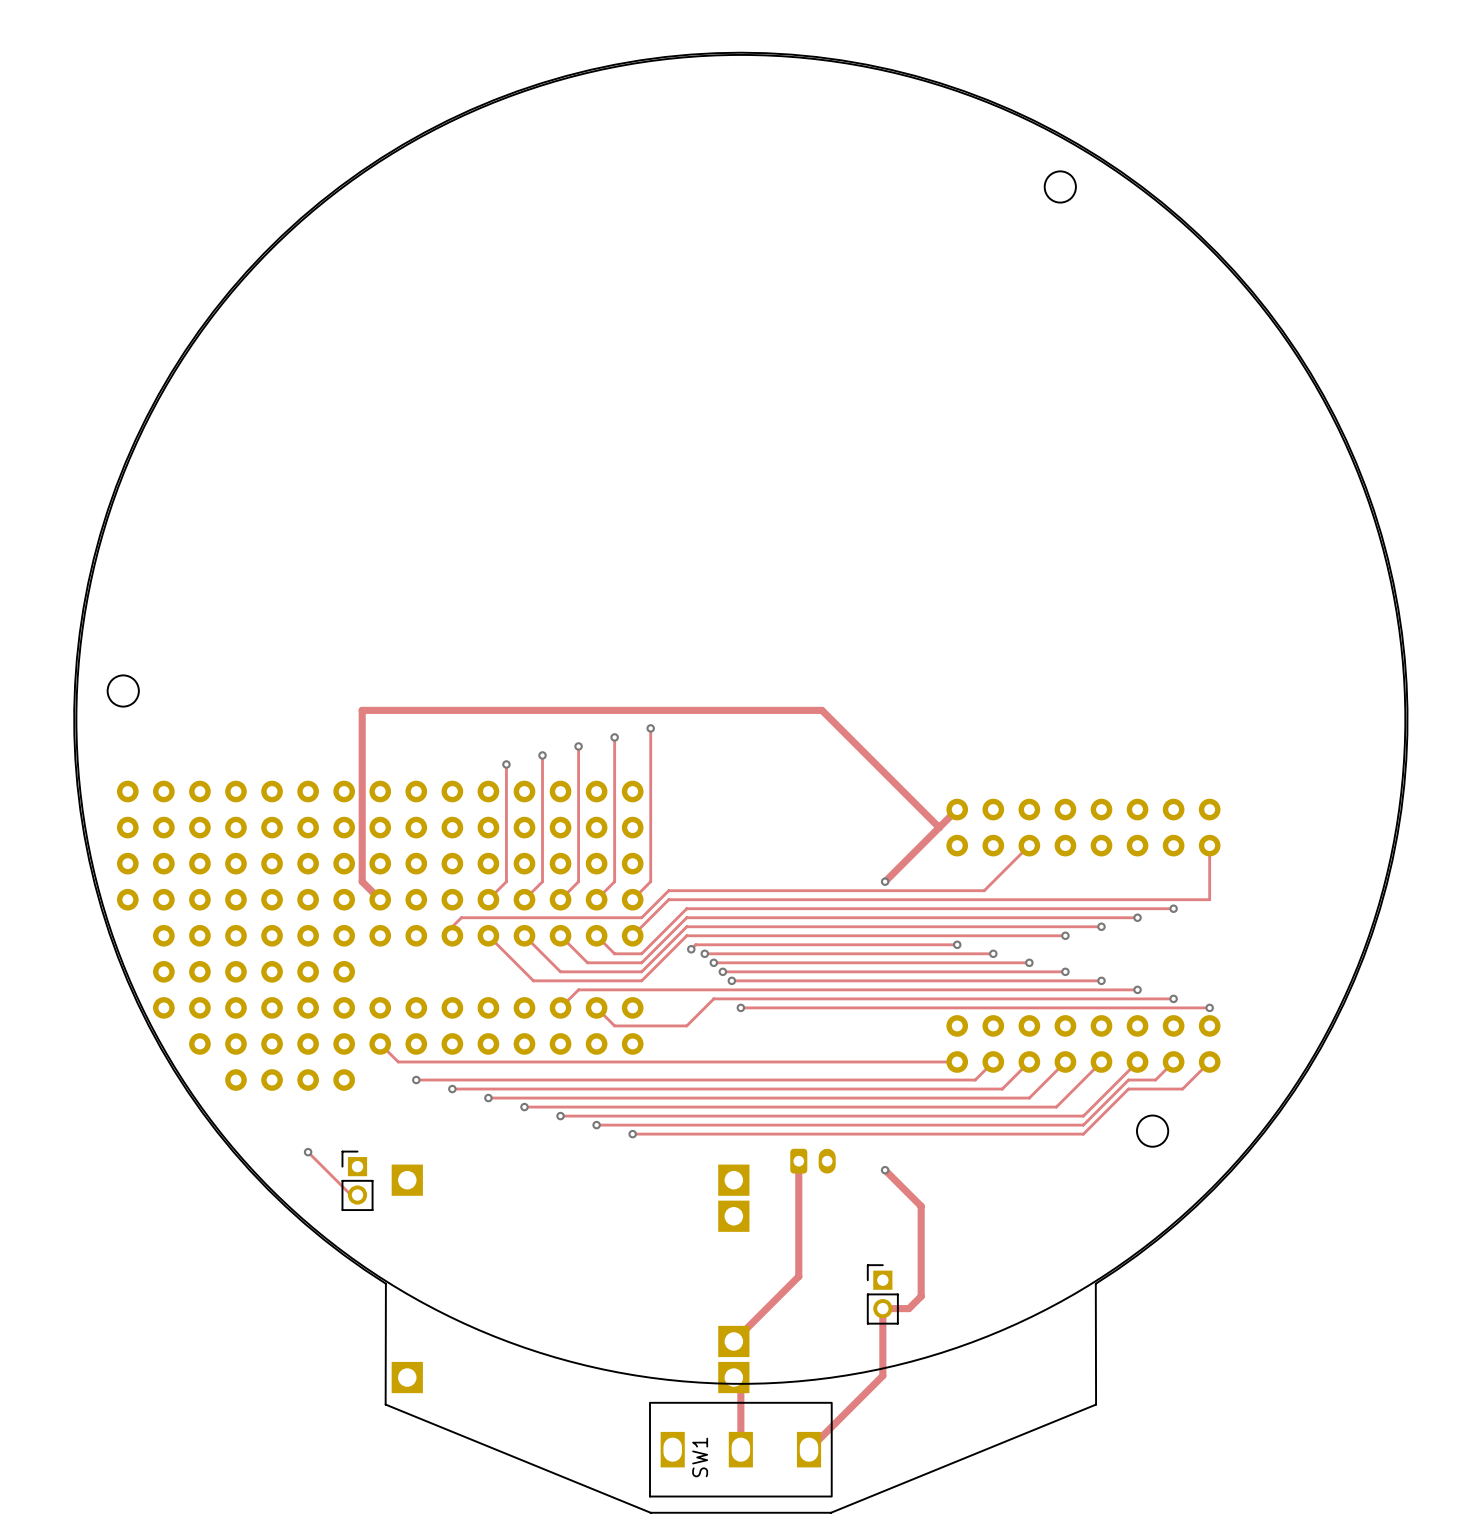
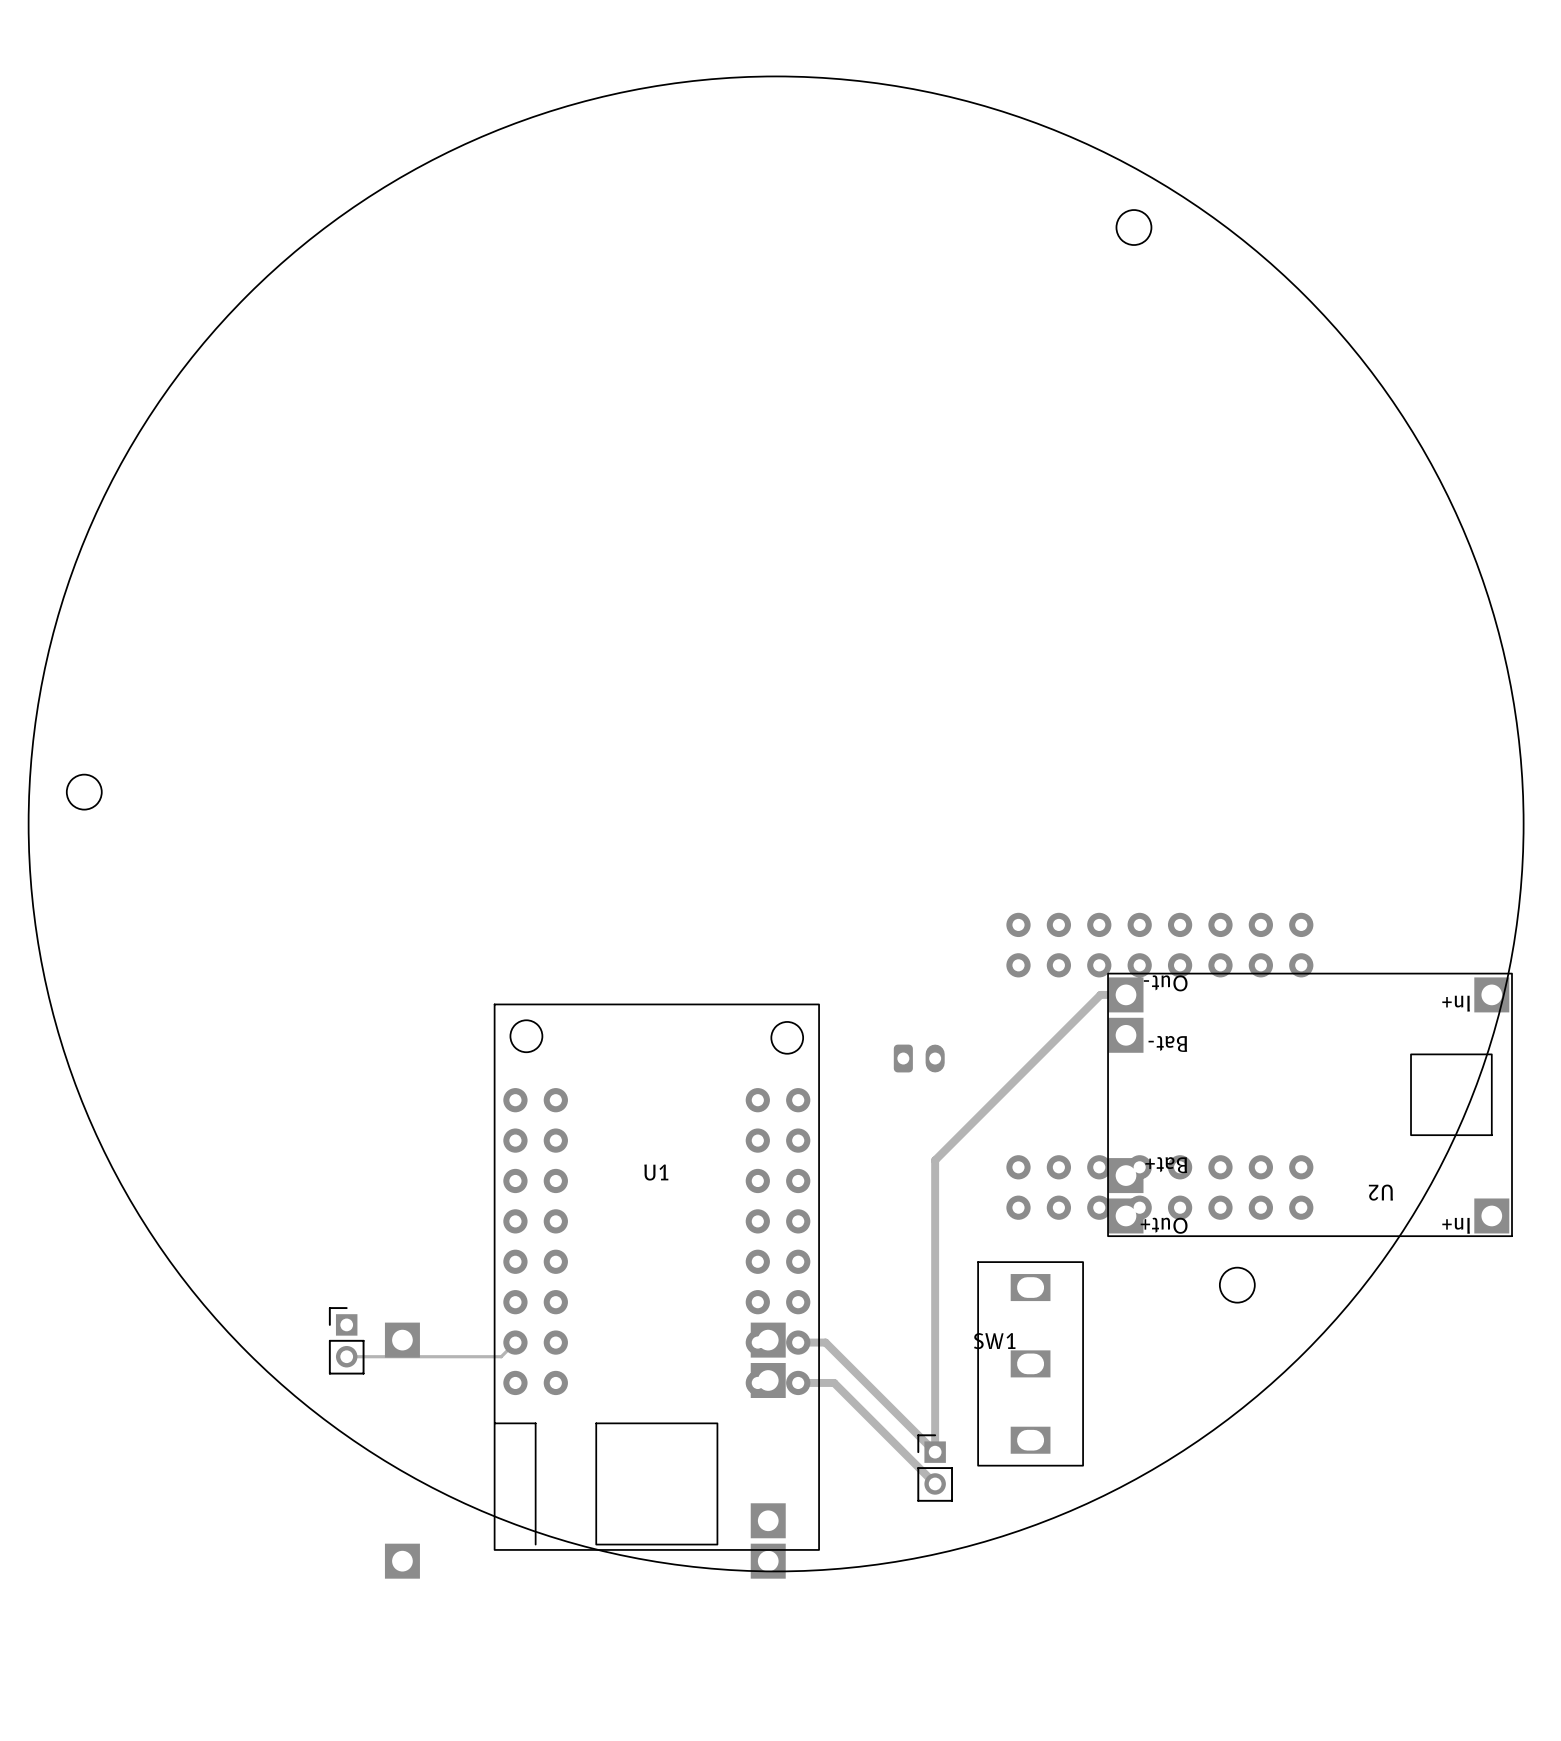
round board edge: none -> [28, 76, 1525, 1572]
drawing: [75, 54, 1407, 1385] -> none
track: (650, 728) (650, 881) (632, 899) -> none
via: (650, 728) -> none
track: (614, 737) (614, 881) (596, 899) -> none
via: (614, 737) -> none
track: (578, 746) (578, 881) (560, 899) -> none
via: (578, 746) -> none
track: (542, 755) (542, 881) (524, 899) -> none
via: (542, 755) -> none
track: (506, 764) (506, 881) (488, 899) -> none
via: (506, 764) -> none
part: (127, 791) -> none
part: (163, 791) -> none
part: (199, 791) -> none
part: (235, 791) -> none
part: (272, 791) -> none
part: (308, 791) -> none
part: (344, 791) -> none
part: (380, 791) -> none
part: (416, 791) -> none
part: (452, 791) -> none
part: (488, 791) -> none
part: (524, 791) -> none
part: (560, 791) -> none
part: (596, 791) -> none
part: (632, 791) -> none
track: (957, 809) (885, 881) -> none
part: (127, 827) -> none
part: (163, 827) -> none
part: (199, 827) -> none
part: (235, 827) -> none
part: (272, 827) -> none
part: (308, 827) -> none
part: (344, 827) -> none
part: (380, 827) -> none
part: (416, 827) -> none
part: (452, 827) -> none
part: (488, 827) -> none
part: (524, 827) -> none
part: (560, 827) -> none
part: (596, 827) -> none
part: (632, 827) -> none
track: (939, 827) (822, 710) (362, 710) (362, 881) (380, 899) -> none
track: (1029, 845) (984, 890) (668, 890) (641, 917) (461, 917) (452, 926) -> none
track: (1209, 845) (1209, 899) (668, 899) (632, 935) -> none
part: (127, 863) -> none
part: (163, 863) -> none
part: (199, 863) -> none
part: (235, 863) -> none
part: (272, 863) -> none
part: (308, 863) -> none
part: (344, 863) -> none
part: (380, 863) -> none
part: (416, 863) -> none
part: (452, 863) -> none
part: (488, 863) -> none
part: (524, 863) -> none
part: (560, 863) -> none
part: (596, 863) -> none
part: (632, 863) -> none
track: none -> (1126, 994) (1100, 994) (935, 1160) (935, 1452) (825, 1342) (798, 1342)
via: (885, 881) -> none
part: (127, 899) -> none
part: (163, 899) -> none
part: (199, 899) -> none
part: (235, 899) -> none
part: (272, 899) -> none
part: (308, 899) -> none
part: (344, 899) -> none
part: (380, 899) -> none
part: (416, 899) -> none
part: (452, 899) -> none
part: (488, 899) -> none
part: (524, 899) -> none
part: (560, 899) -> none
part: (596, 899) -> none
part: (632, 899) -> none
track: (1173, 908) (686, 908) (641, 953) (614, 953) (596, 935) -> none
via: (1173, 908) -> none
track: (1137, 917) (686, 917) (641, 962) (587, 962) (560, 935) -> none
via: (1137, 917) -> none
track: (1101, 926) (686, 926) (641, 971) (560, 971) (524, 935) -> none
via: (1101, 926) -> none
part: (163, 935) -> none
part: (199, 935) -> none
part: (235, 935) -> none
part: (272, 935) -> none
part: (308, 935) -> none
part: (344, 935) -> none
part: (380, 935) -> none
part: (416, 935) -> none
part: (452, 935) -> none
track: (488, 935) (533, 980) (641, 980) (686, 935) (1065, 935) -> none
part: (488, 935) -> none
part: (524, 935) -> none
part: (560, 935) -> none
part: (596, 935) -> none
part: (632, 935) -> none
via: (1065, 935) -> none
track: (957, 944) (695, 944) (691, 949) -> none
via: (957, 944) -> none
via: (691, 949) -> none
track: (704, 953) (993, 953) -> none
via: (704, 953) -> none
via: (993, 953) -> none
track: (713, 962) (1029, 962) -> none
via: (713, 962) -> none
via: (1029, 962) -> none
U2: none -> (1310, 1104)
part: (163, 971) -> none
part: (199, 971) -> none
part: (235, 971) -> none
part: (272, 971) -> none
part: (308, 971) -> none
part: (344, 971) -> none
track: (722, 971) (1065, 971) -> none
via: (722, 971) -> none
via: (1065, 971) -> none
track: (731, 980) (1101, 980) -> none
via: (731, 980) -> none
via: (1101, 980) -> none
track: (1137, 989) (578, 989) (560, 1007) -> none
via: (1137, 989) -> none
track: (1173, 998) (713, 998) (686, 1025) (614, 1025) (596, 1007) -> none
via: (1173, 998) -> none
part: (163, 1007) -> none
part: (199, 1007) -> none
part: (235, 1007) -> none
part: (272, 1007) -> none
part: (308, 1007) -> none
part: (344, 1007) -> none
part: (380, 1007) -> none
part: (416, 1007) -> none
part: (452, 1007) -> none
part: (488, 1007) -> none
part: (524, 1007) -> none
part: (560, 1007) -> none
part: (596, 1007) -> none
part: (632, 1007) -> none
track: (740, 1007) (1209, 1007) -> none
via: (740, 1007) -> none
via: (1209, 1007) -> none
part: (199, 1043) -> none
part: (235, 1043) -> none
part: (272, 1043) -> none
part: (308, 1043) -> none
part: (344, 1043) -> none
track: (380, 1043) (398, 1061) (957, 1061) -> none
part: (380, 1043) -> none
part: (416, 1043) -> none
part: (452, 1043) -> none
part: (488, 1043) -> none
part: (524, 1043) -> none
part: (560, 1043) -> none
part: (596, 1043) -> none
part: (632, 1043) -> none
track: (993, 1061) (975, 1080) (416, 1080) -> none
track: (1029, 1061) (1002, 1089) (452, 1089) -> none
track: (1065, 1061) (1029, 1098) (488, 1098) -> none
track: (1101, 1061) (1056, 1107) (524, 1107) -> none
track: (1137, 1061) (1083, 1116) (560, 1116) -> none
track: (1173, 1061) (1155, 1080) (1128, 1080) (1083, 1125) (596, 1125) -> none
track: (1209, 1061) (1182, 1089) (1128, 1089) (1083, 1134) (632, 1134) -> none
part: (235, 1080) -> none
part: (272, 1080) -> none
part: (308, 1080) -> none
part: (344, 1080) -> none
via: (416, 1080) -> none
via: (452, 1089) -> none
via: (488, 1098) -> none
via: (524, 1107) -> none
via: (560, 1116) -> none
U1: none -> (656, 1277)
via: (596, 1125) -> none
via: (632, 1134) -> none
track: (308, 1152) (350, 1195) -> none
via: (308, 1152) -> none
track: (798, 1161) (798, 1276) (733, 1341) -> none
part position: (812, 1161) -> (919, 1058)
track: (885, 1170) (921, 1206) (921, 1296) (908, 1308) (882, 1308) (882, 1375) (809, 1449) -> none
via: (885, 1170) -> none
track: none -> (515, 1342) (501, 1356) (346, 1356)
track: none -> (798, 1382) (834, 1382) (935, 1483)
board edge: (385, 1283) (385, 1404) (650, 1512) (831, 1512) (1096, 1404) (1095, 1283) (1137, 1255) (1177, 1223) (1214, 1189) (1248, 1151) (1279, 1112) (1307, 1070) (1332, 1026) (1354, 980) (1372, 933) (1392, 860) (1404, 785) (1407, 709) (1402, 633) (1388, 559) (1374, 510) (1356, 463) (1323, 394) (1282, 330) (1251, 290) (1217, 253) (1161, 202) (1100, 157) (1034, 120) (987, 100) (940, 83) (866, 64) (791, 54) (740, 52) (665, 57) (590, 69) (541, 83) (470, 109) (425, 132) (360, 171) (300, 218) (264, 253) (230, 290) (184, 351) (158, 394) (125, 463) (107, 510) (88, 583) (76, 658) (74, 734) (80, 810) (89, 860) (109, 933) (127, 980) (161, 1048) (202, 1112) (250, 1170) (285, 1206) (324, 1239) (385, 1283) -> none
track: (733, 1377) (740, 1384) (740, 1449) -> none
SW1 rotation: 0° (740, 1449) -> 90° clockwise (1030, 1363)
SW1 position: (740, 1449) -> (1030, 1363)
SW1 name position: SW1 (700, 1457) -> SW1 (994, 1341)

